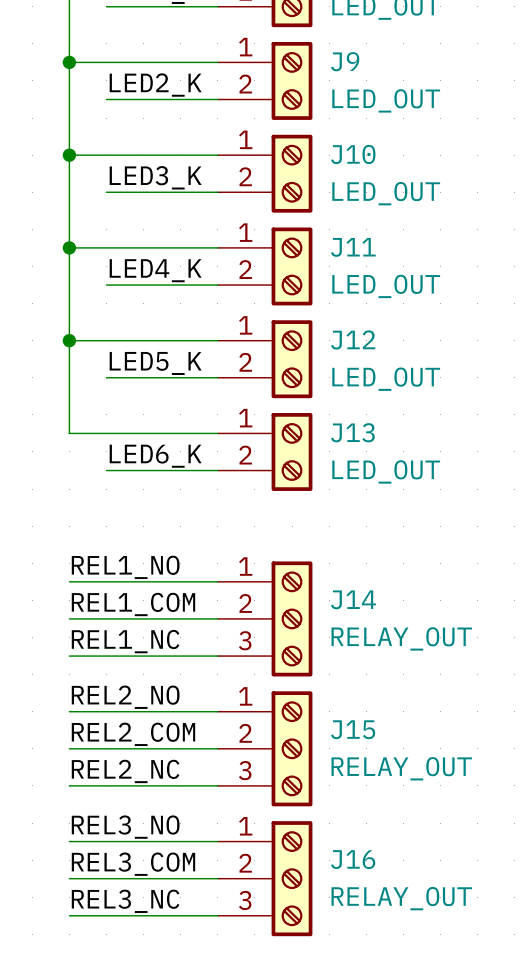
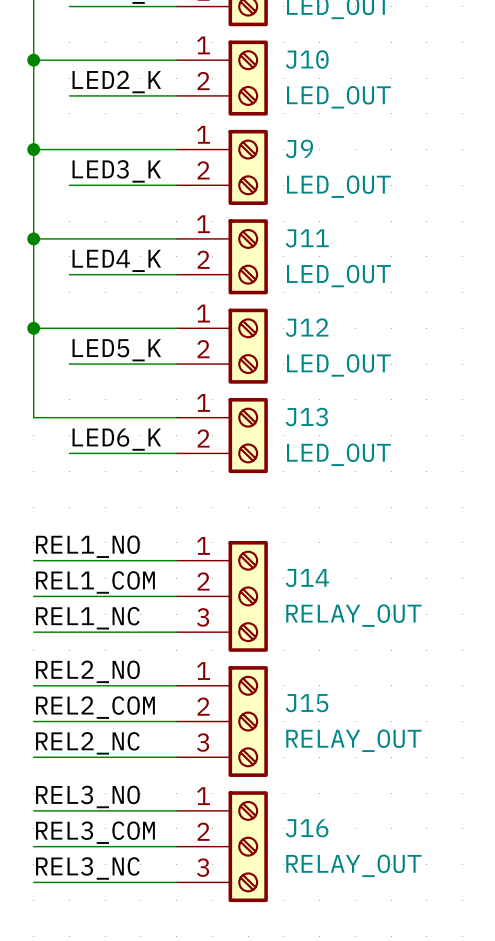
J9 name: J9 (345, 61) -> J10 (307, 59)
J10 name: J10 (353, 154) -> J9 (299, 148)

